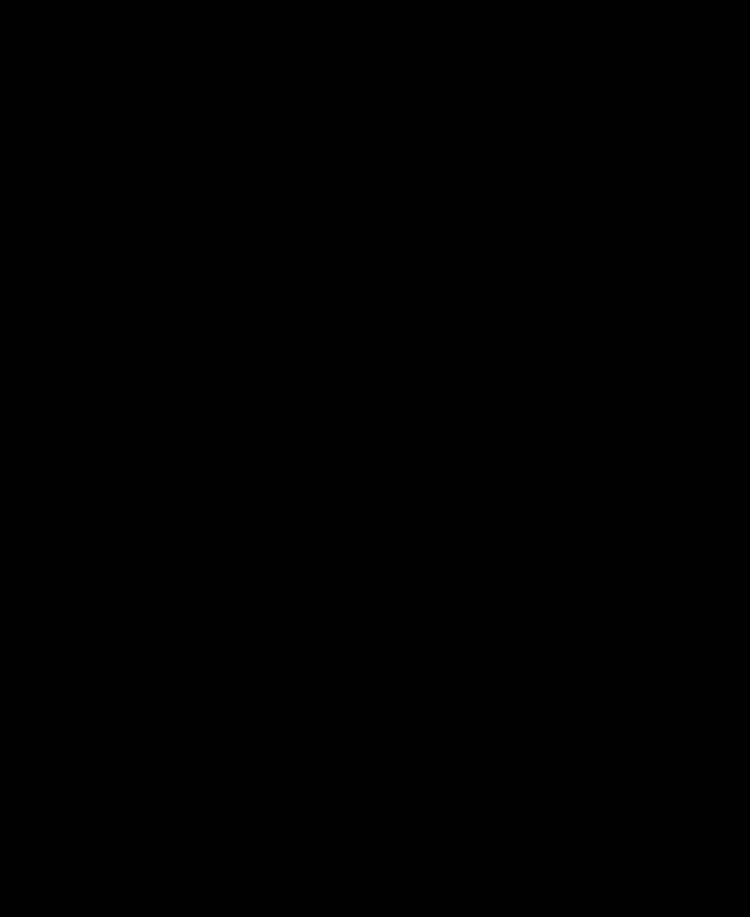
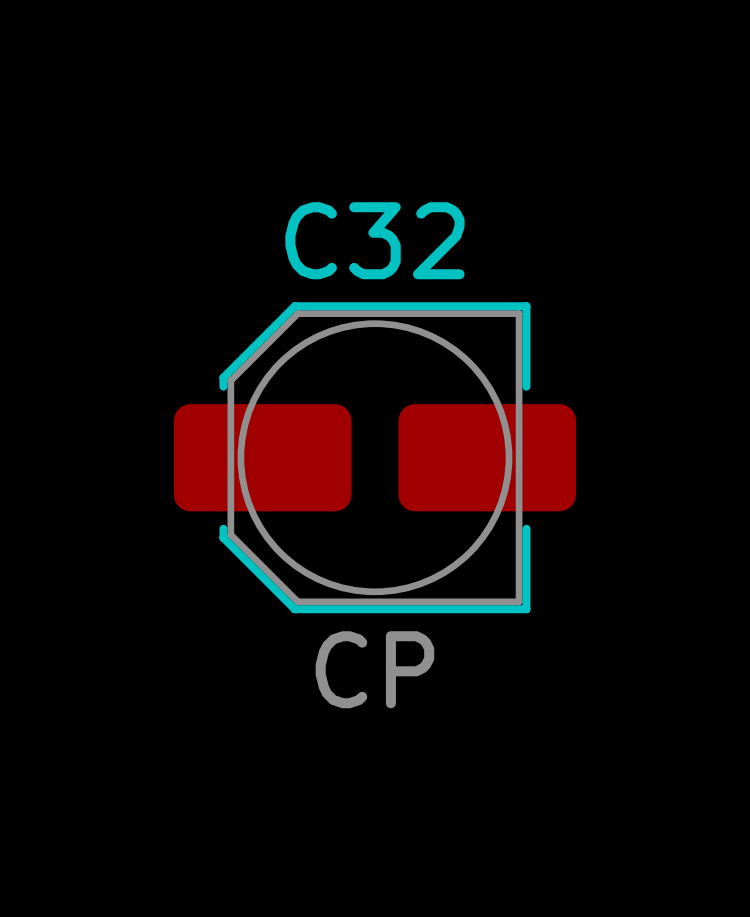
C32: none -> CP (374, 457)

